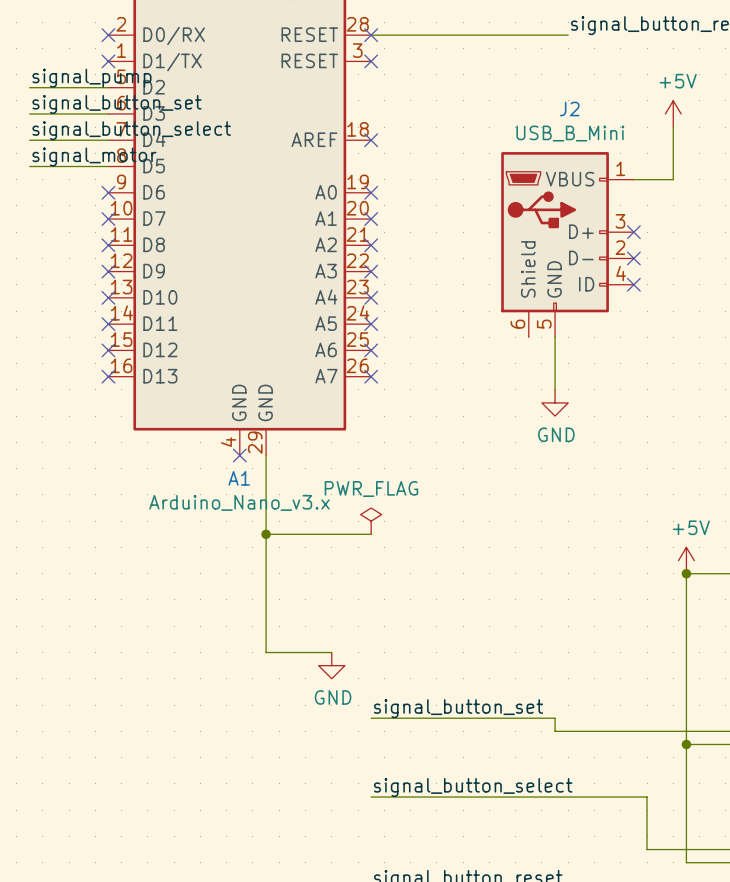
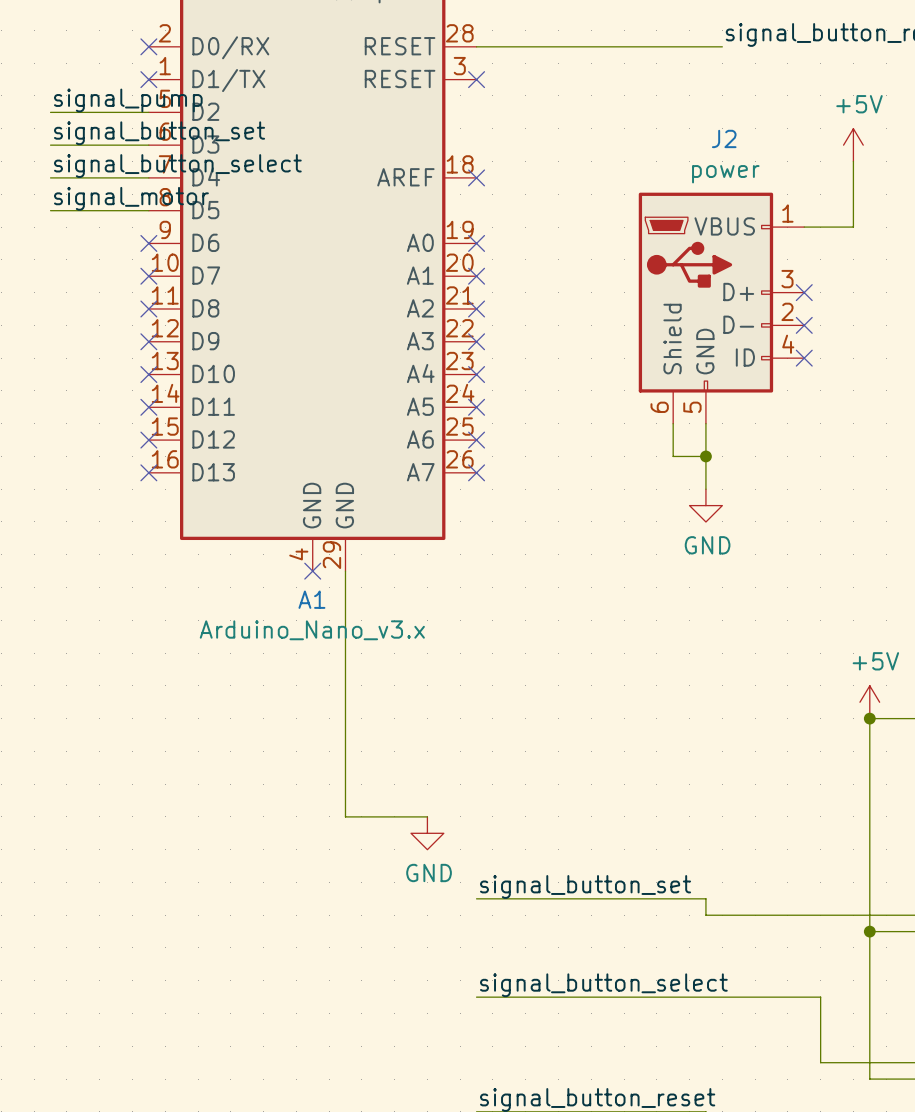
no-connect mark: (371, 35) -> none
J2 value: USB_B_Mini (570, 133) -> power (725, 174)
wire: none -> (673, 423) (673, 456) (705, 456)
junction: none -> (705, 456)
power symbol: PWR_FLAG (371, 521) -> none
wire: (266, 534) (371, 534) -> none
junction: (266, 534) -> none

